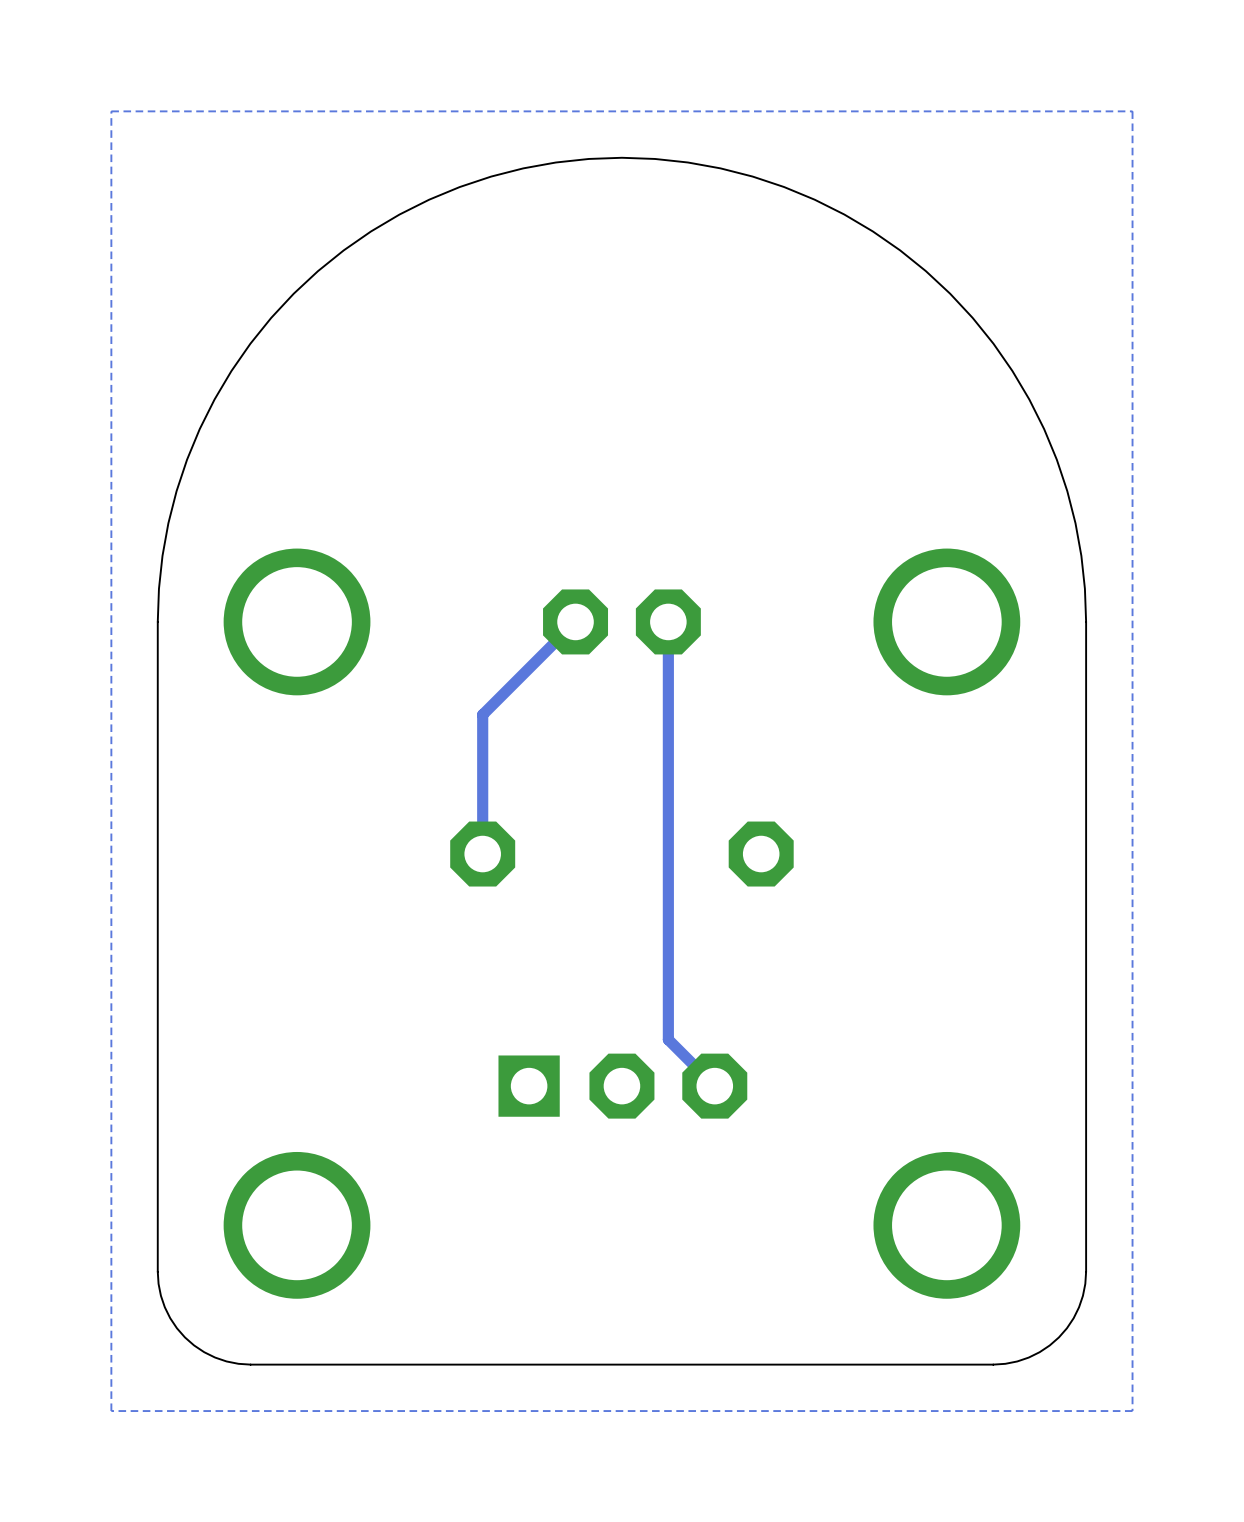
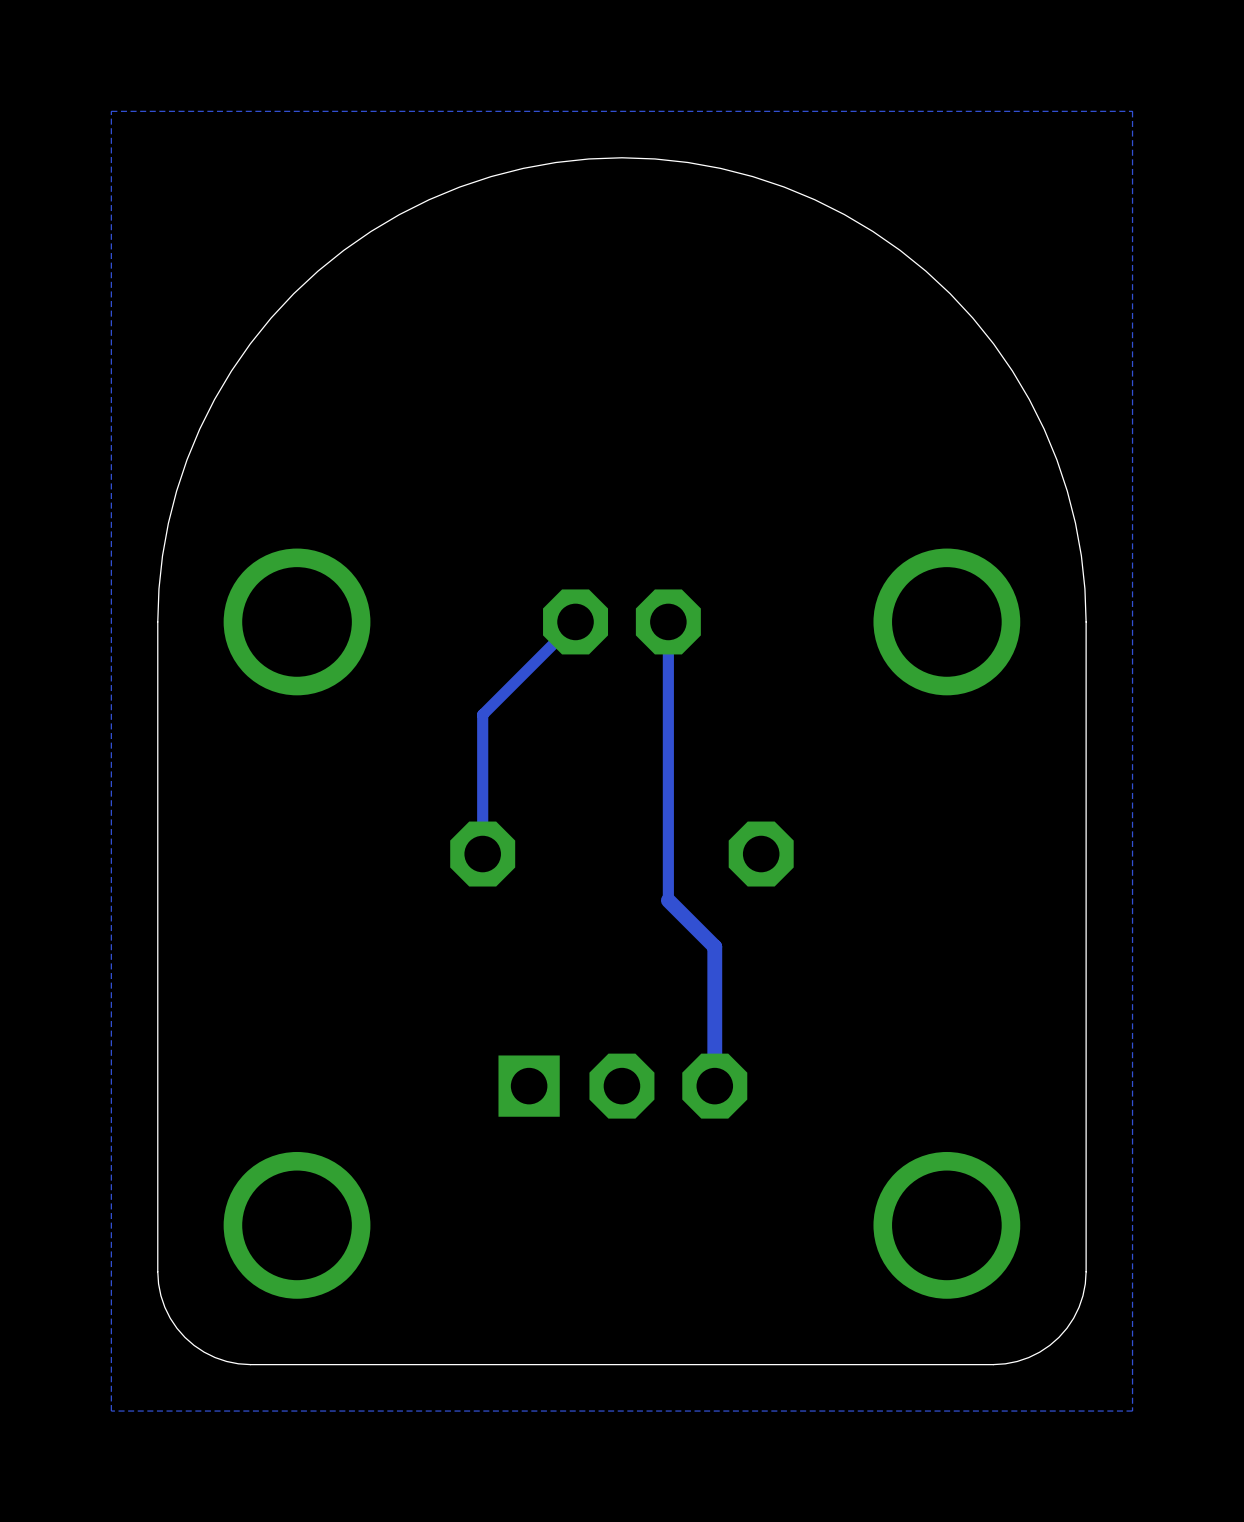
track: (668, 900) (668, 1039) (714, 1086) -> (668, 900) (714, 946) (714, 1086)

